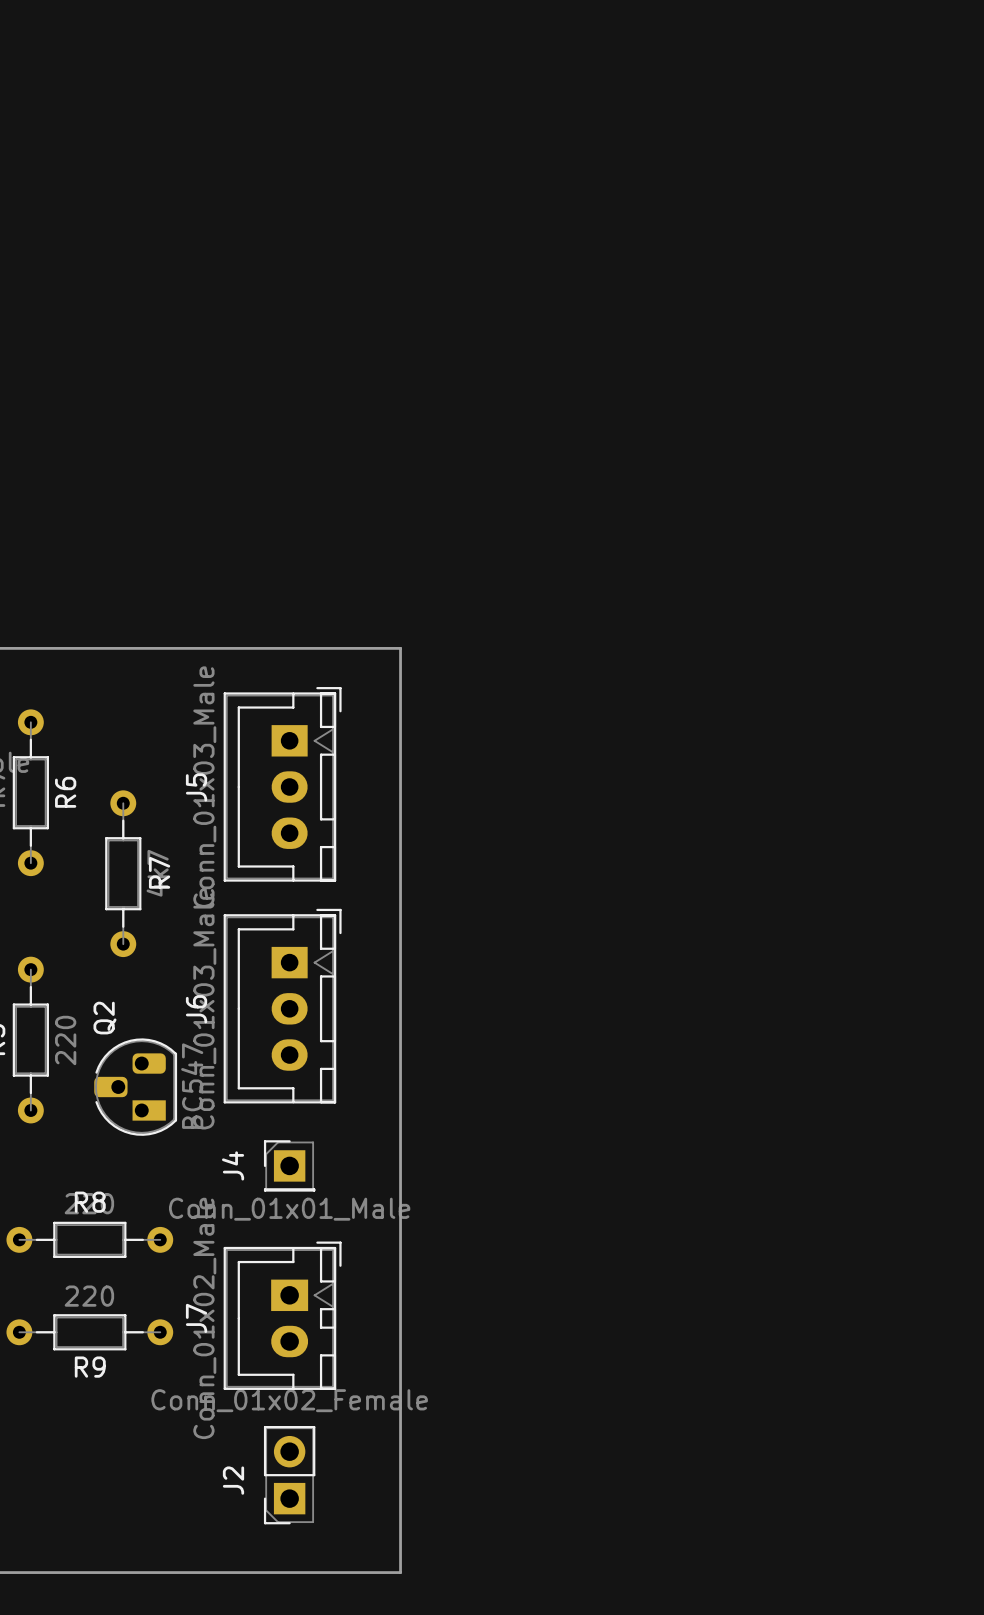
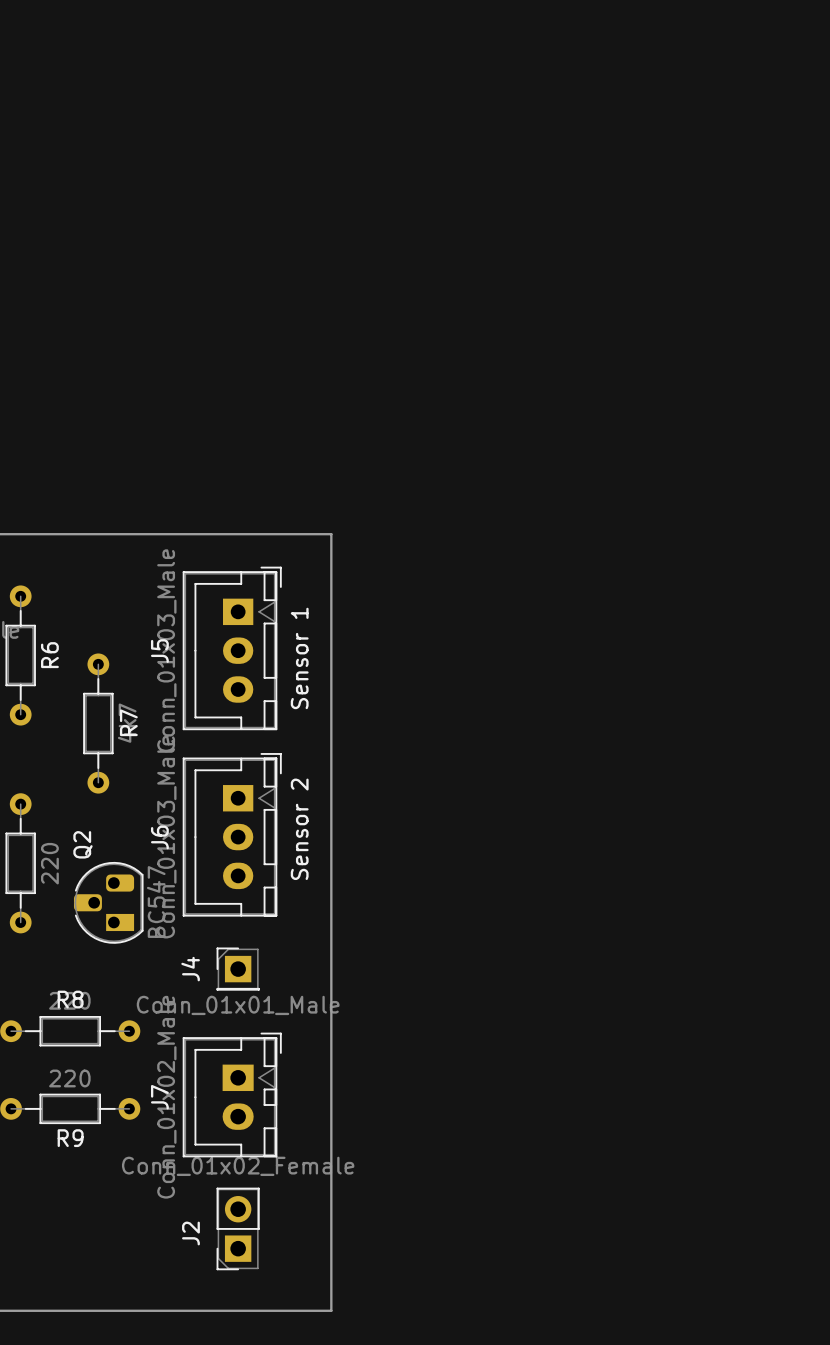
text: none -> Sensor 1 (299, 658)
text: none -> Sensor 2 (299, 829)

